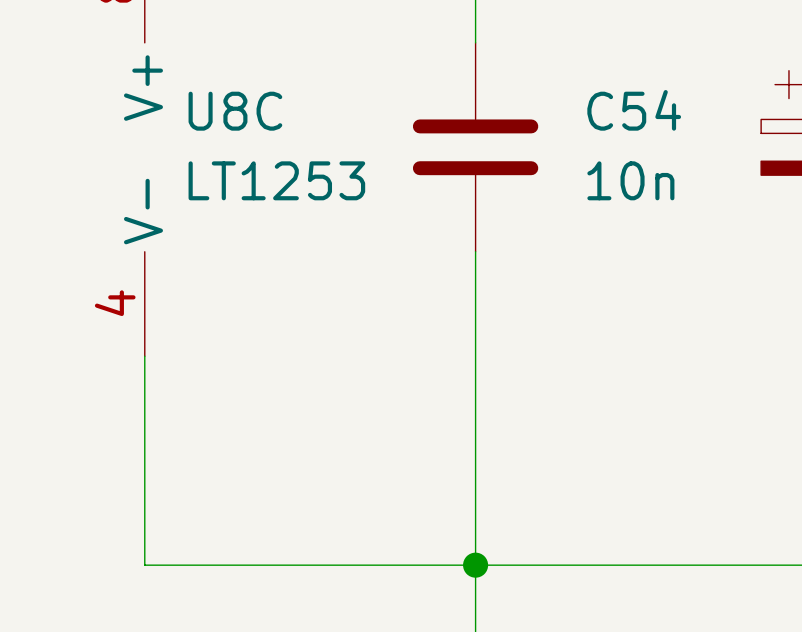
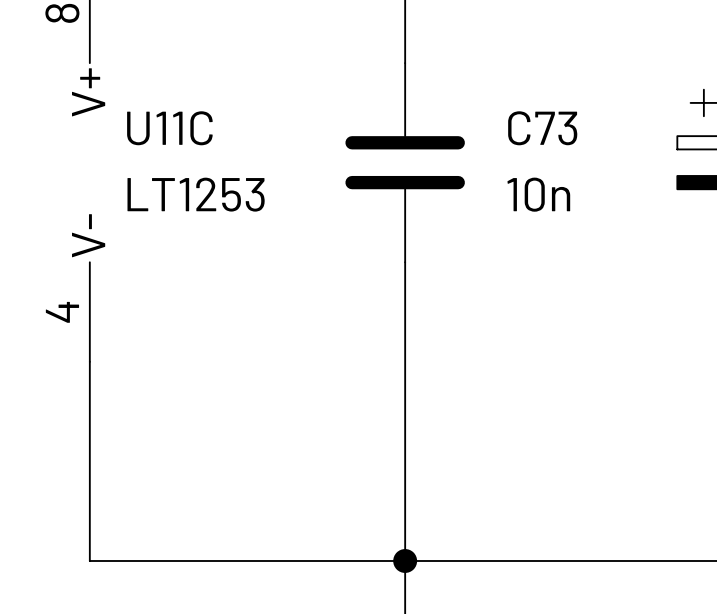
C54 name: C54 (634, 110) -> C73 (542, 128)
U8C name: U8C (235, 111) -> U11C (169, 128)

